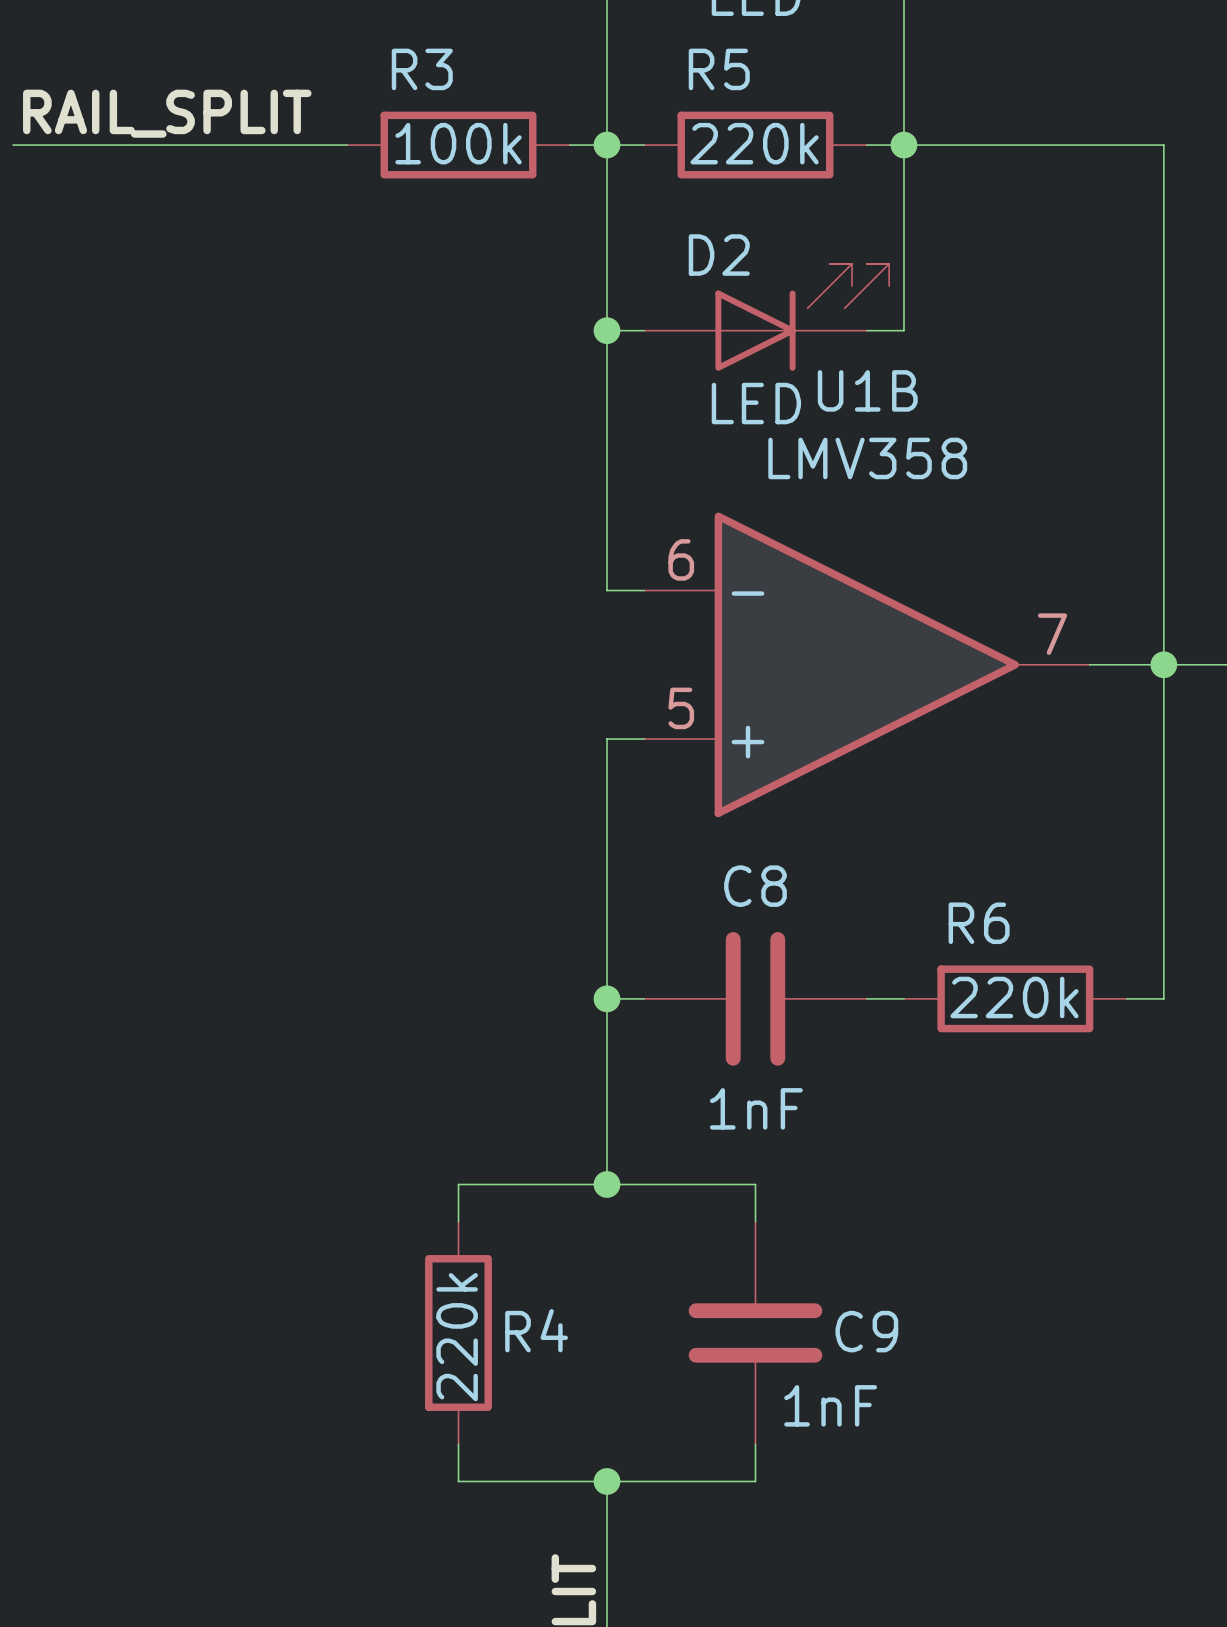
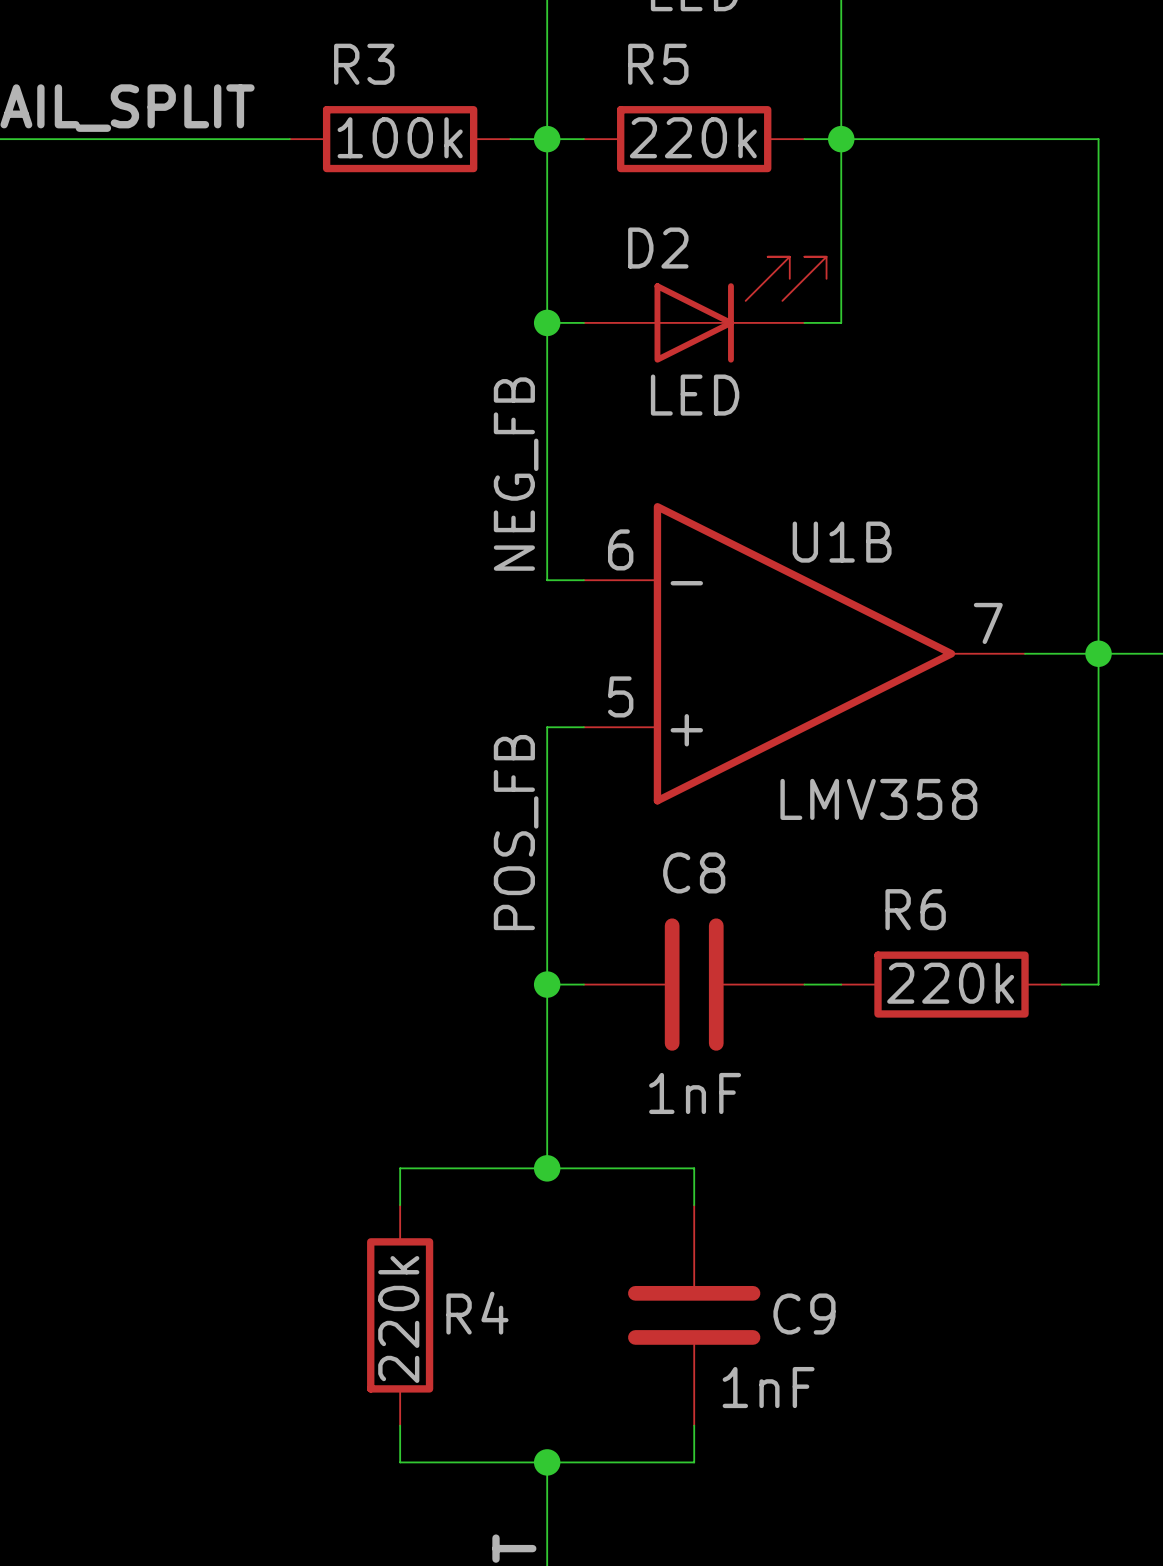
U1B name position: U1B (867, 390) -> U1B (842, 542)
U1B value position: LMV358 (867, 458) -> LMV358 (878, 799)
label: none -> NEG_FB (516, 474)
label: none -> POS_FB (516, 832)

